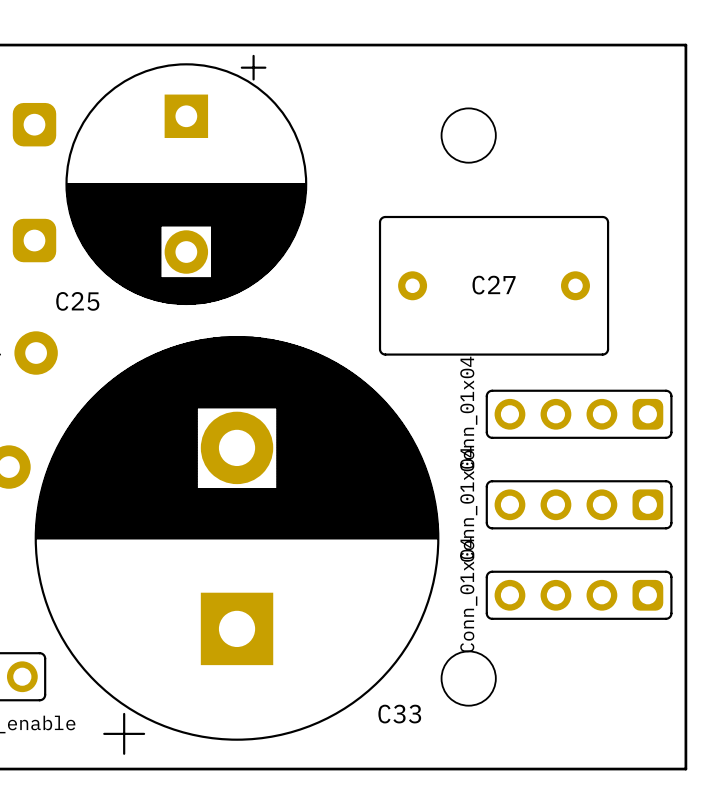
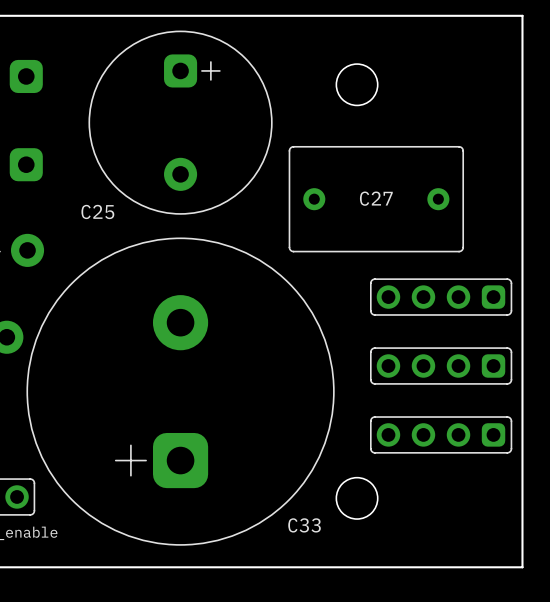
C25 footprint: [65, 54, 308, 306] -> [88, 30, 273, 215]
C33 footprint: [34, 336, 440, 755] -> [26, 237, 335, 546]
part value: Conn_01x04 (468, 413) -> none
part value: Conn_01x04 (468, 504) -> none
part value: Conn_01x04 (468, 594) -> none

